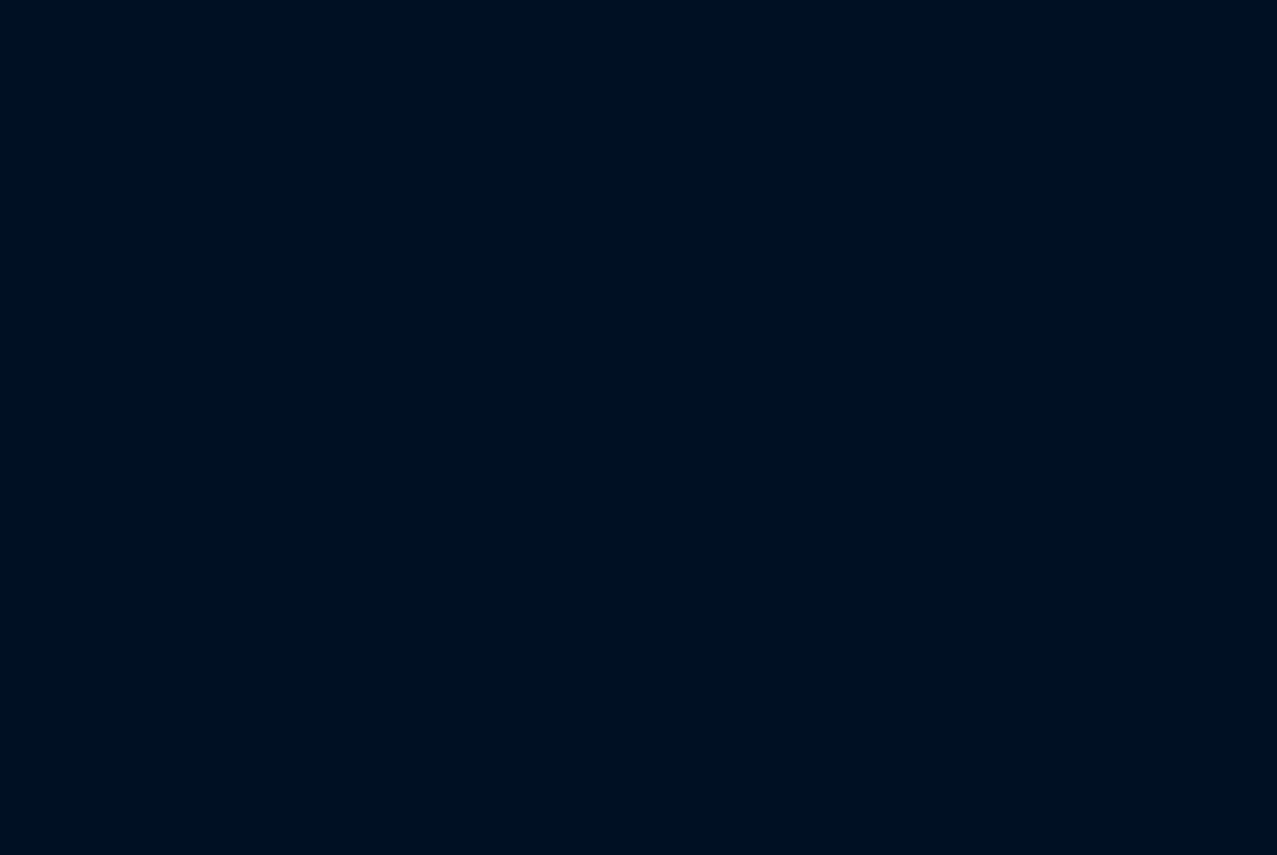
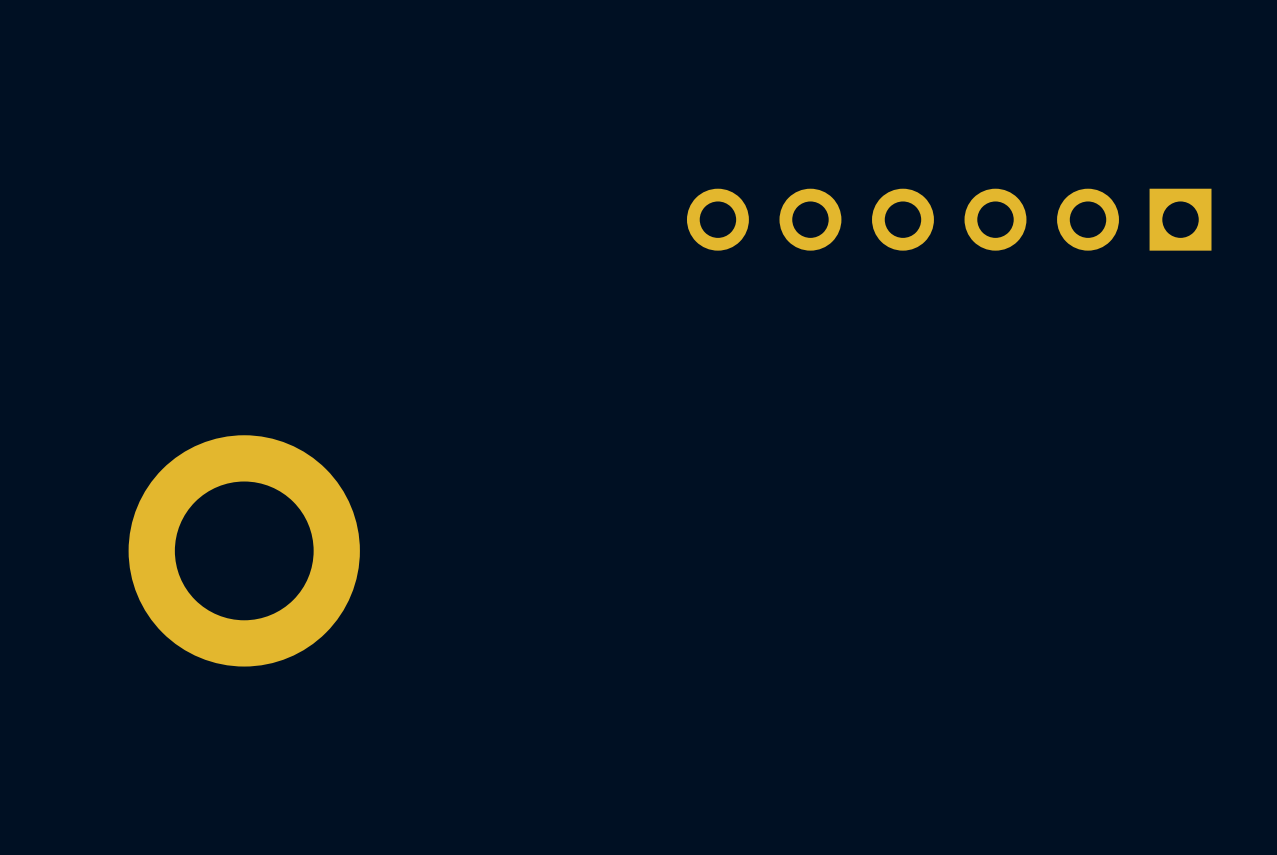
part: none -> (949, 219)
part: none -> (244, 550)

